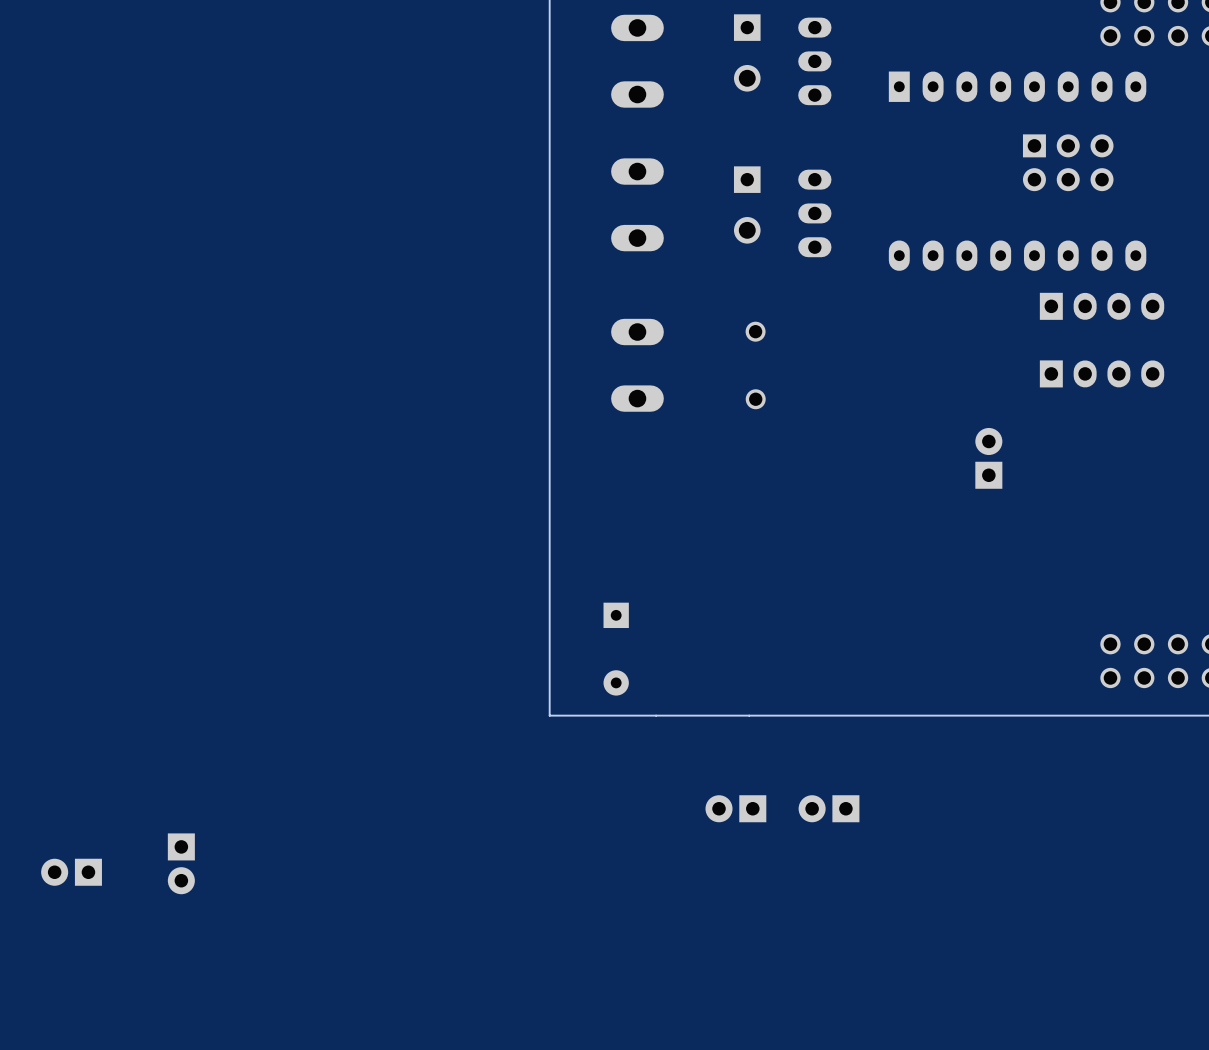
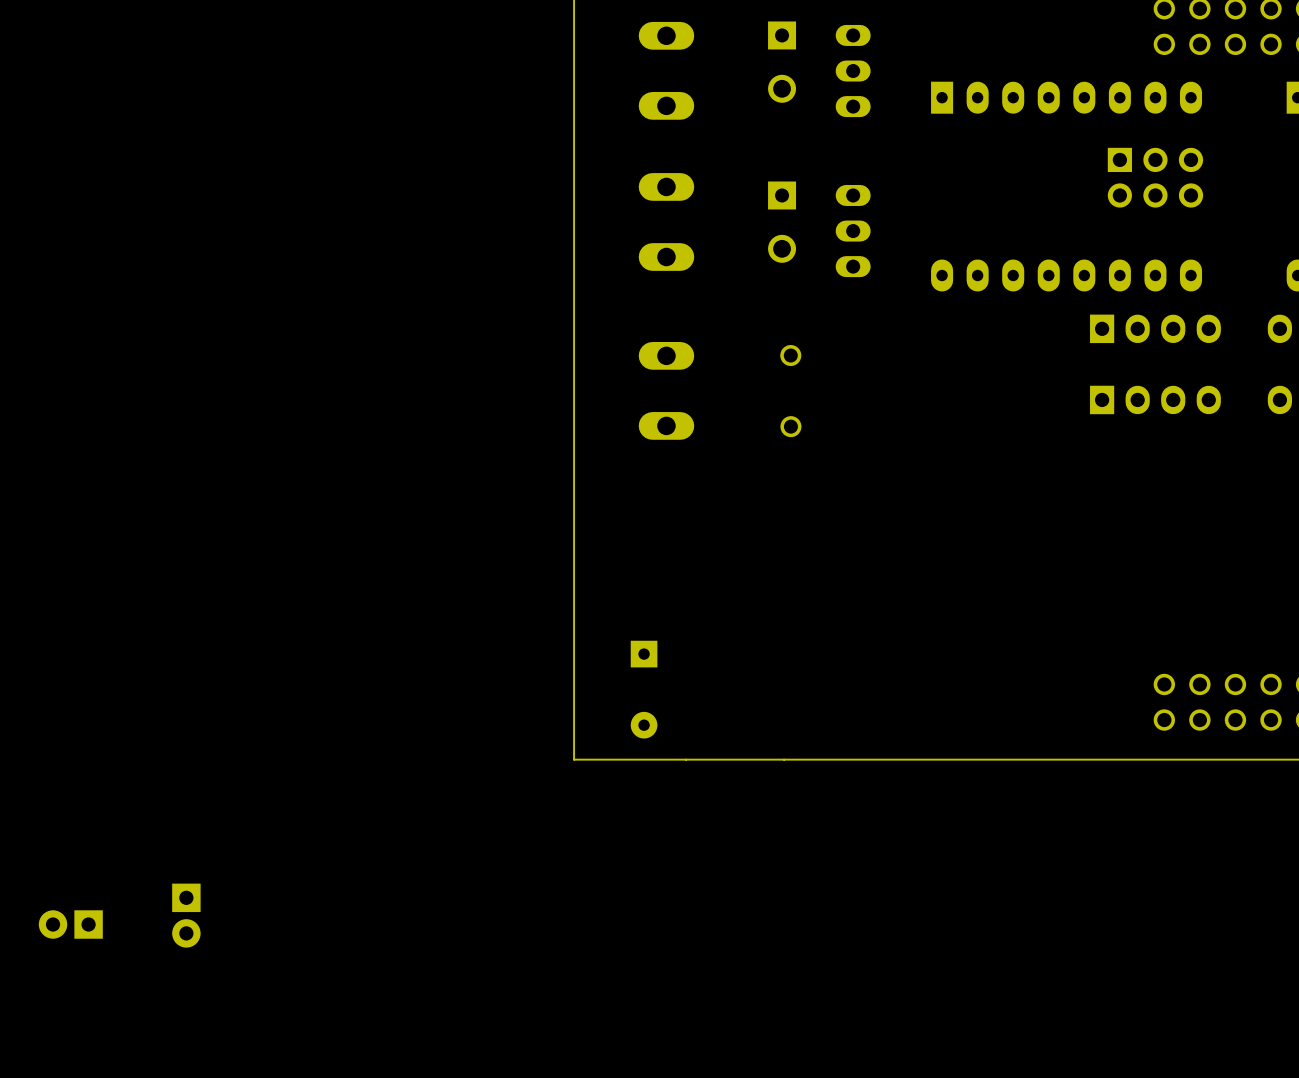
part position: (1068, 162) -> (1155, 177)
part: (988, 458) -> none
part: (735, 808) -> none
part: (829, 808) -> none

